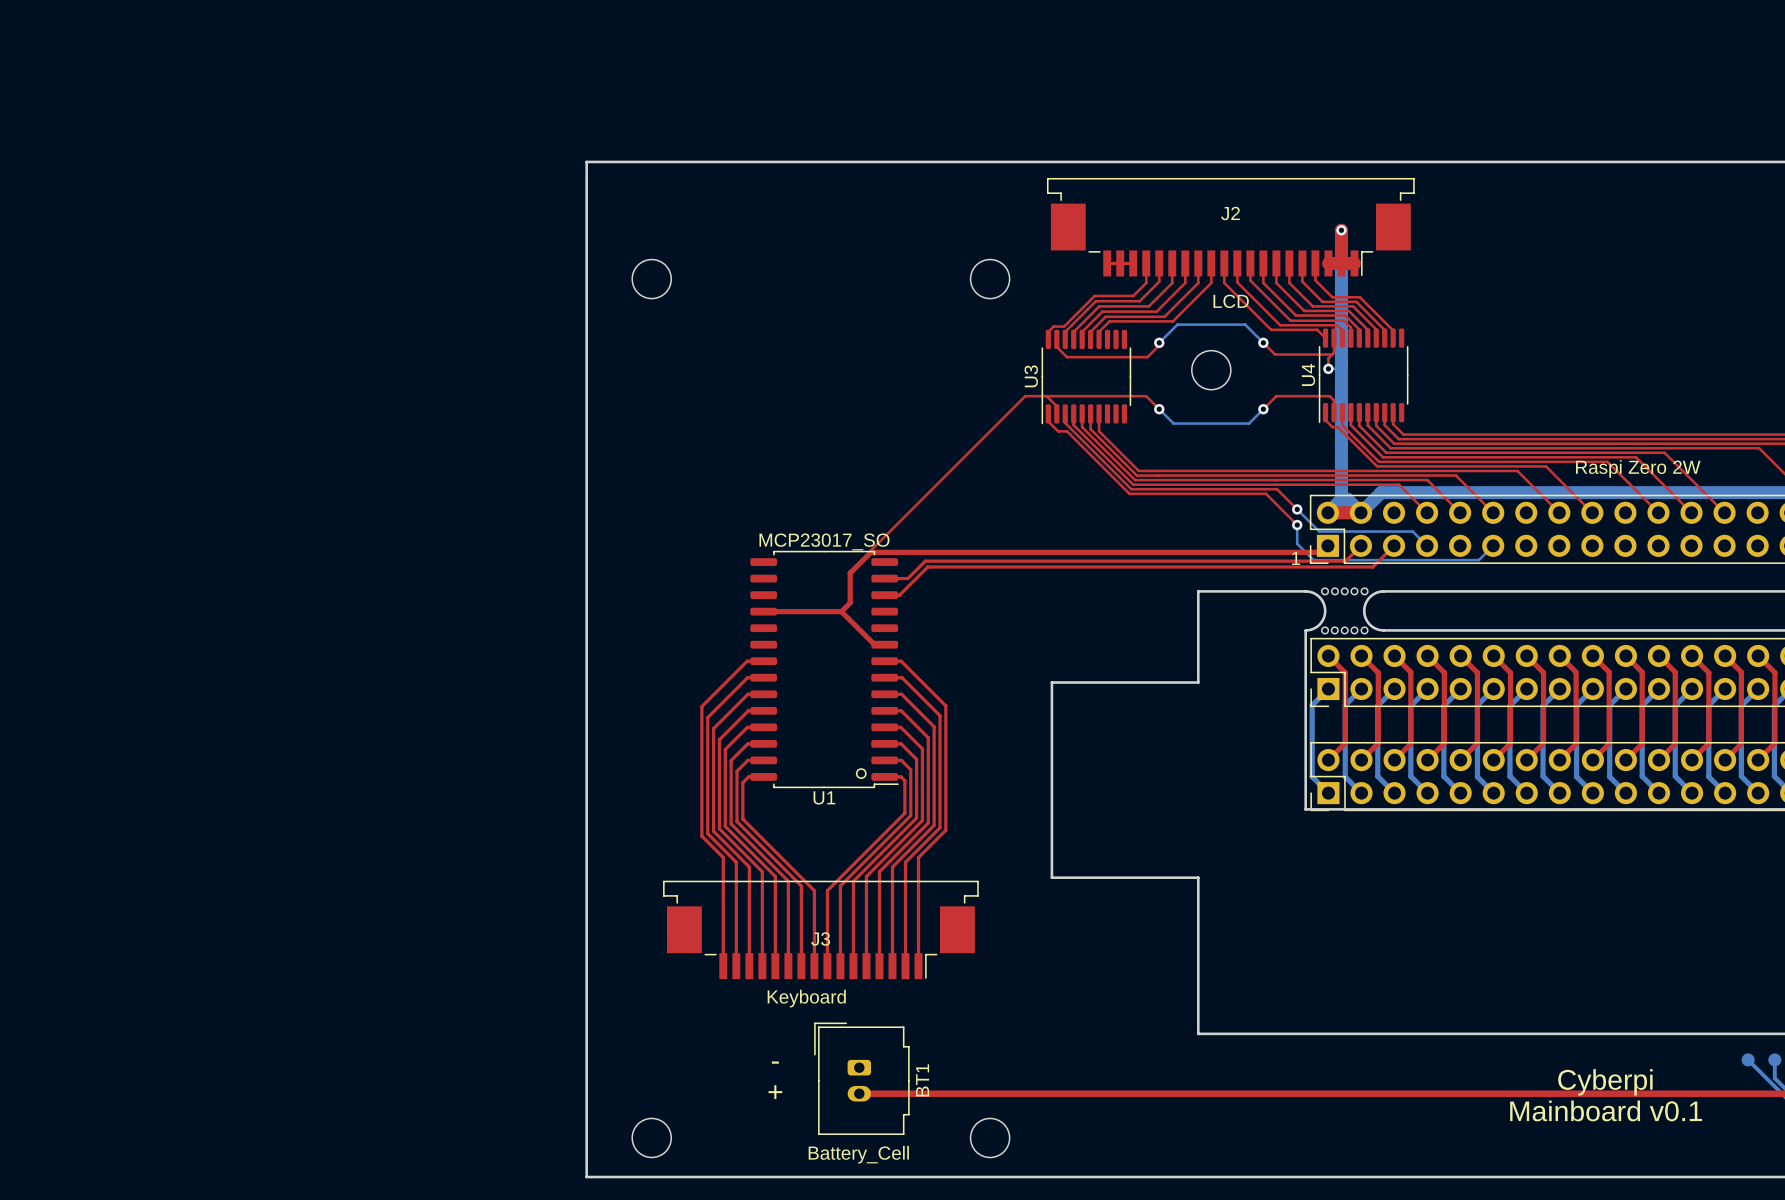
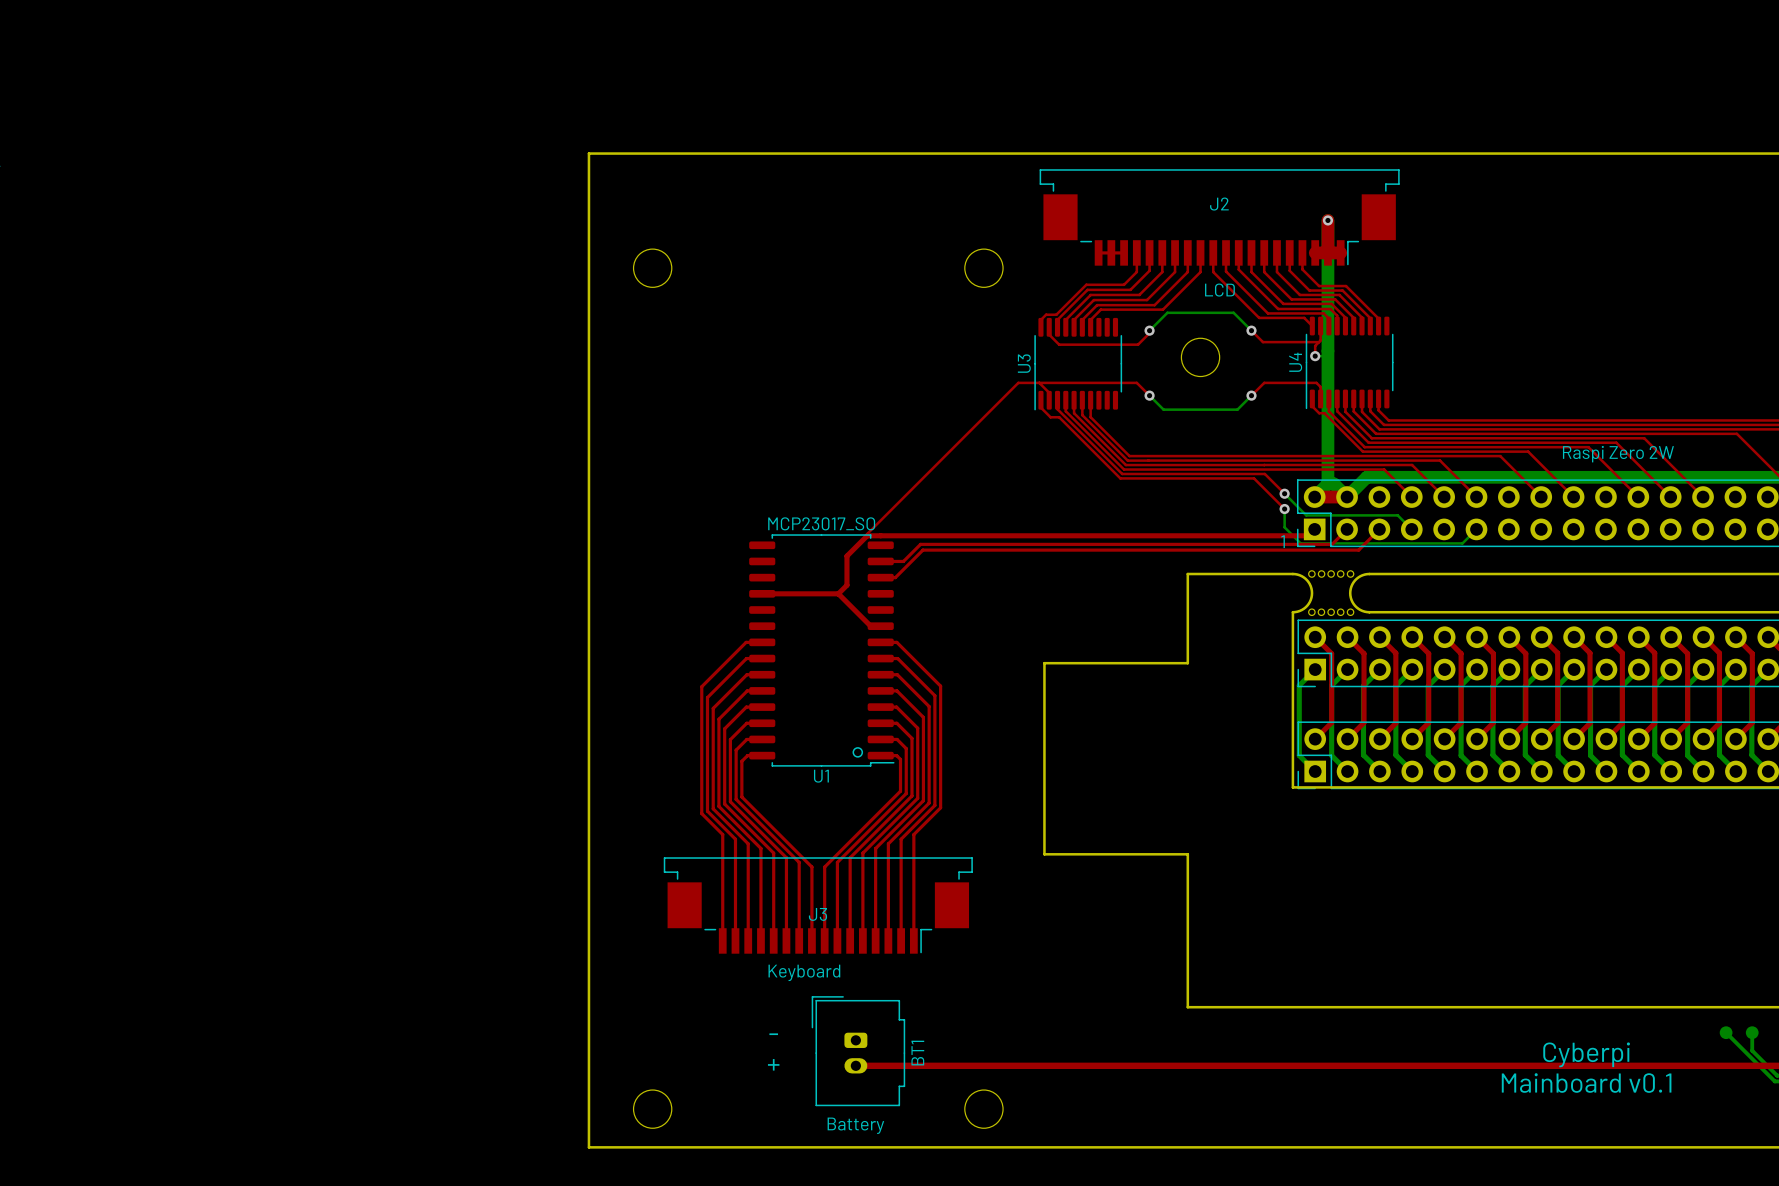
BT1 value: Battery_Cell (858, 1154) -> Battery (855, 1125)

